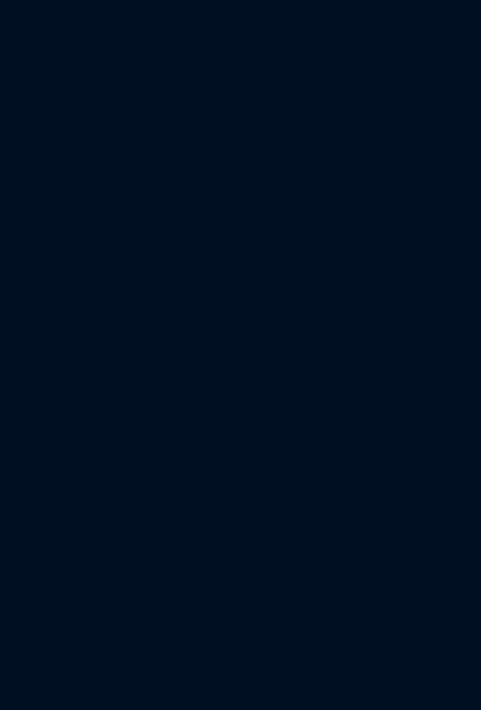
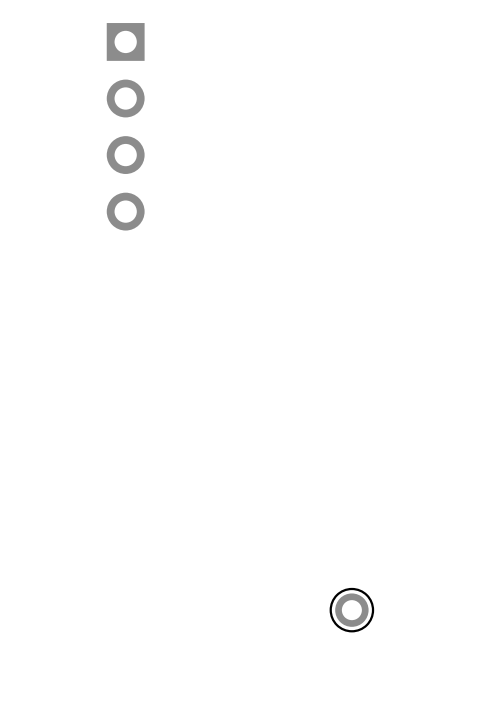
part: none -> (125, 126)
part: none -> (351, 610)

